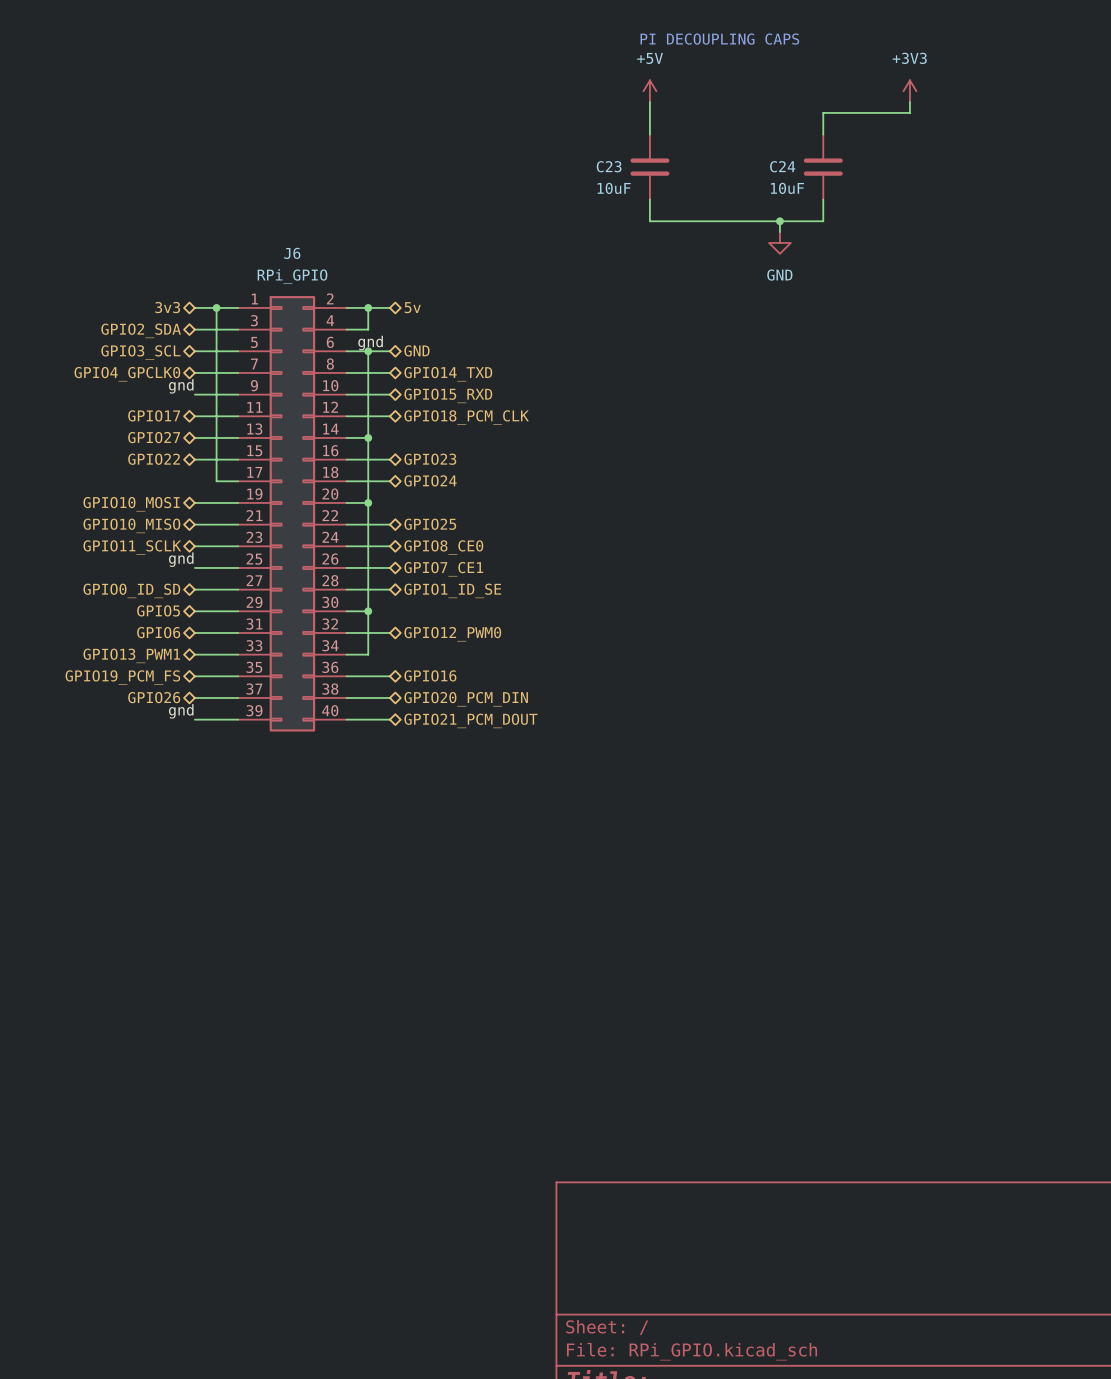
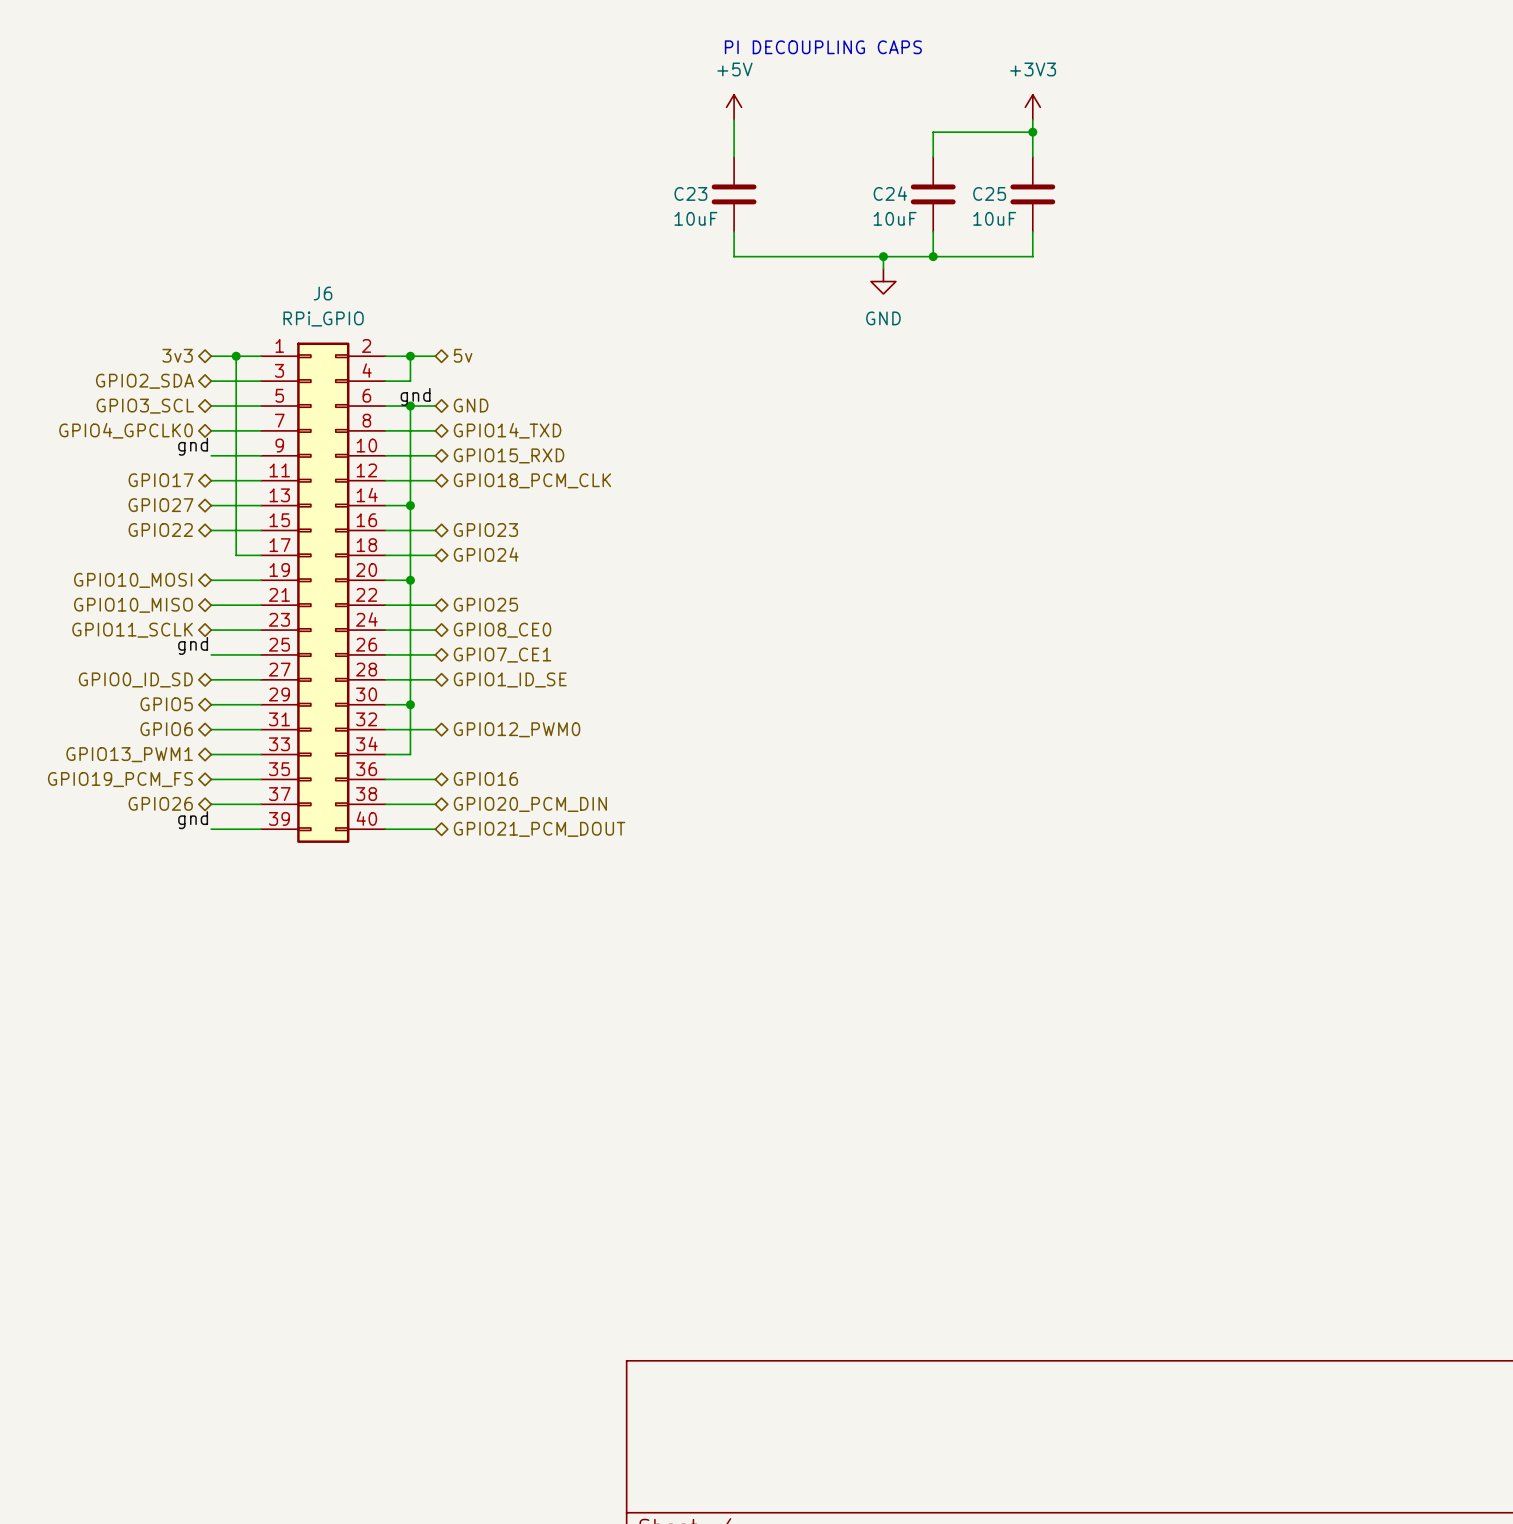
wire: none -> (1032, 132) (1032, 157)
junction: none -> (1032, 132)
C25: none -> 10uF (1032, 194)
wire: none -> (1032, 231) (1032, 256) (933, 256)
junction: none -> (933, 256)

